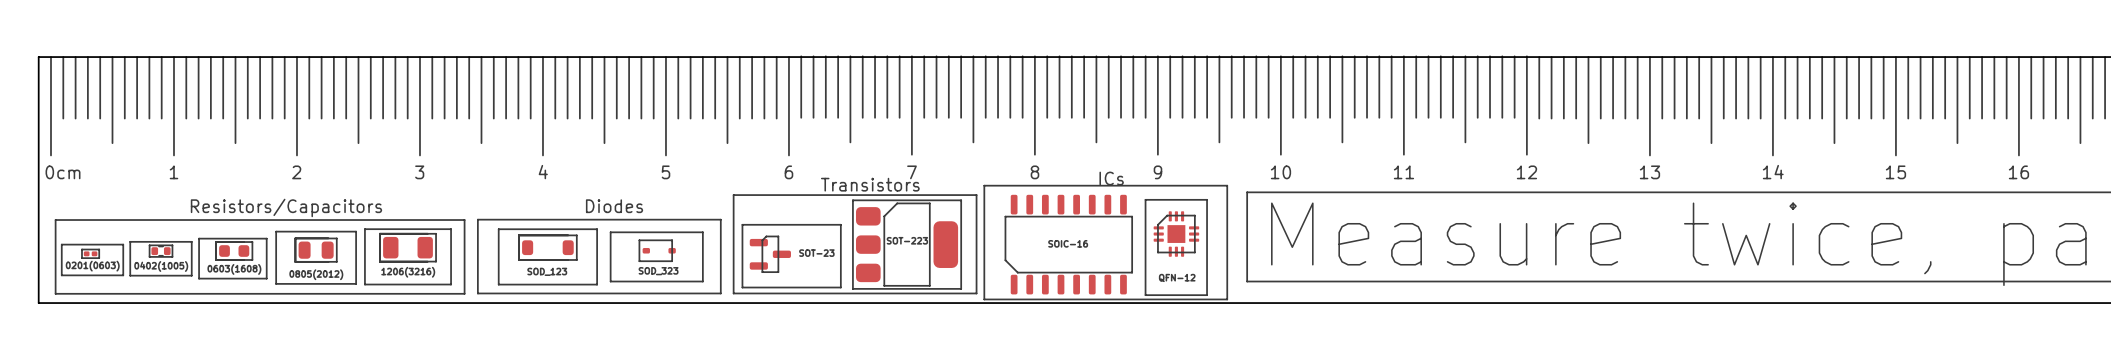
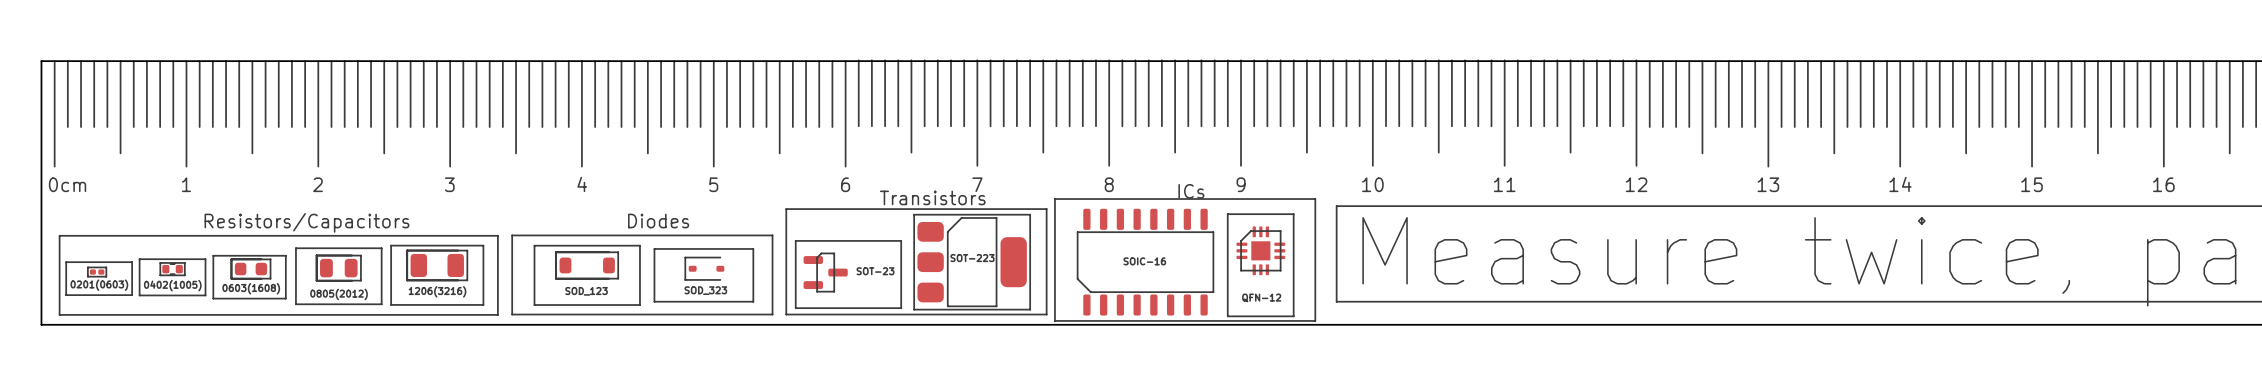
line: (672, 240) (672, 261) -> none

